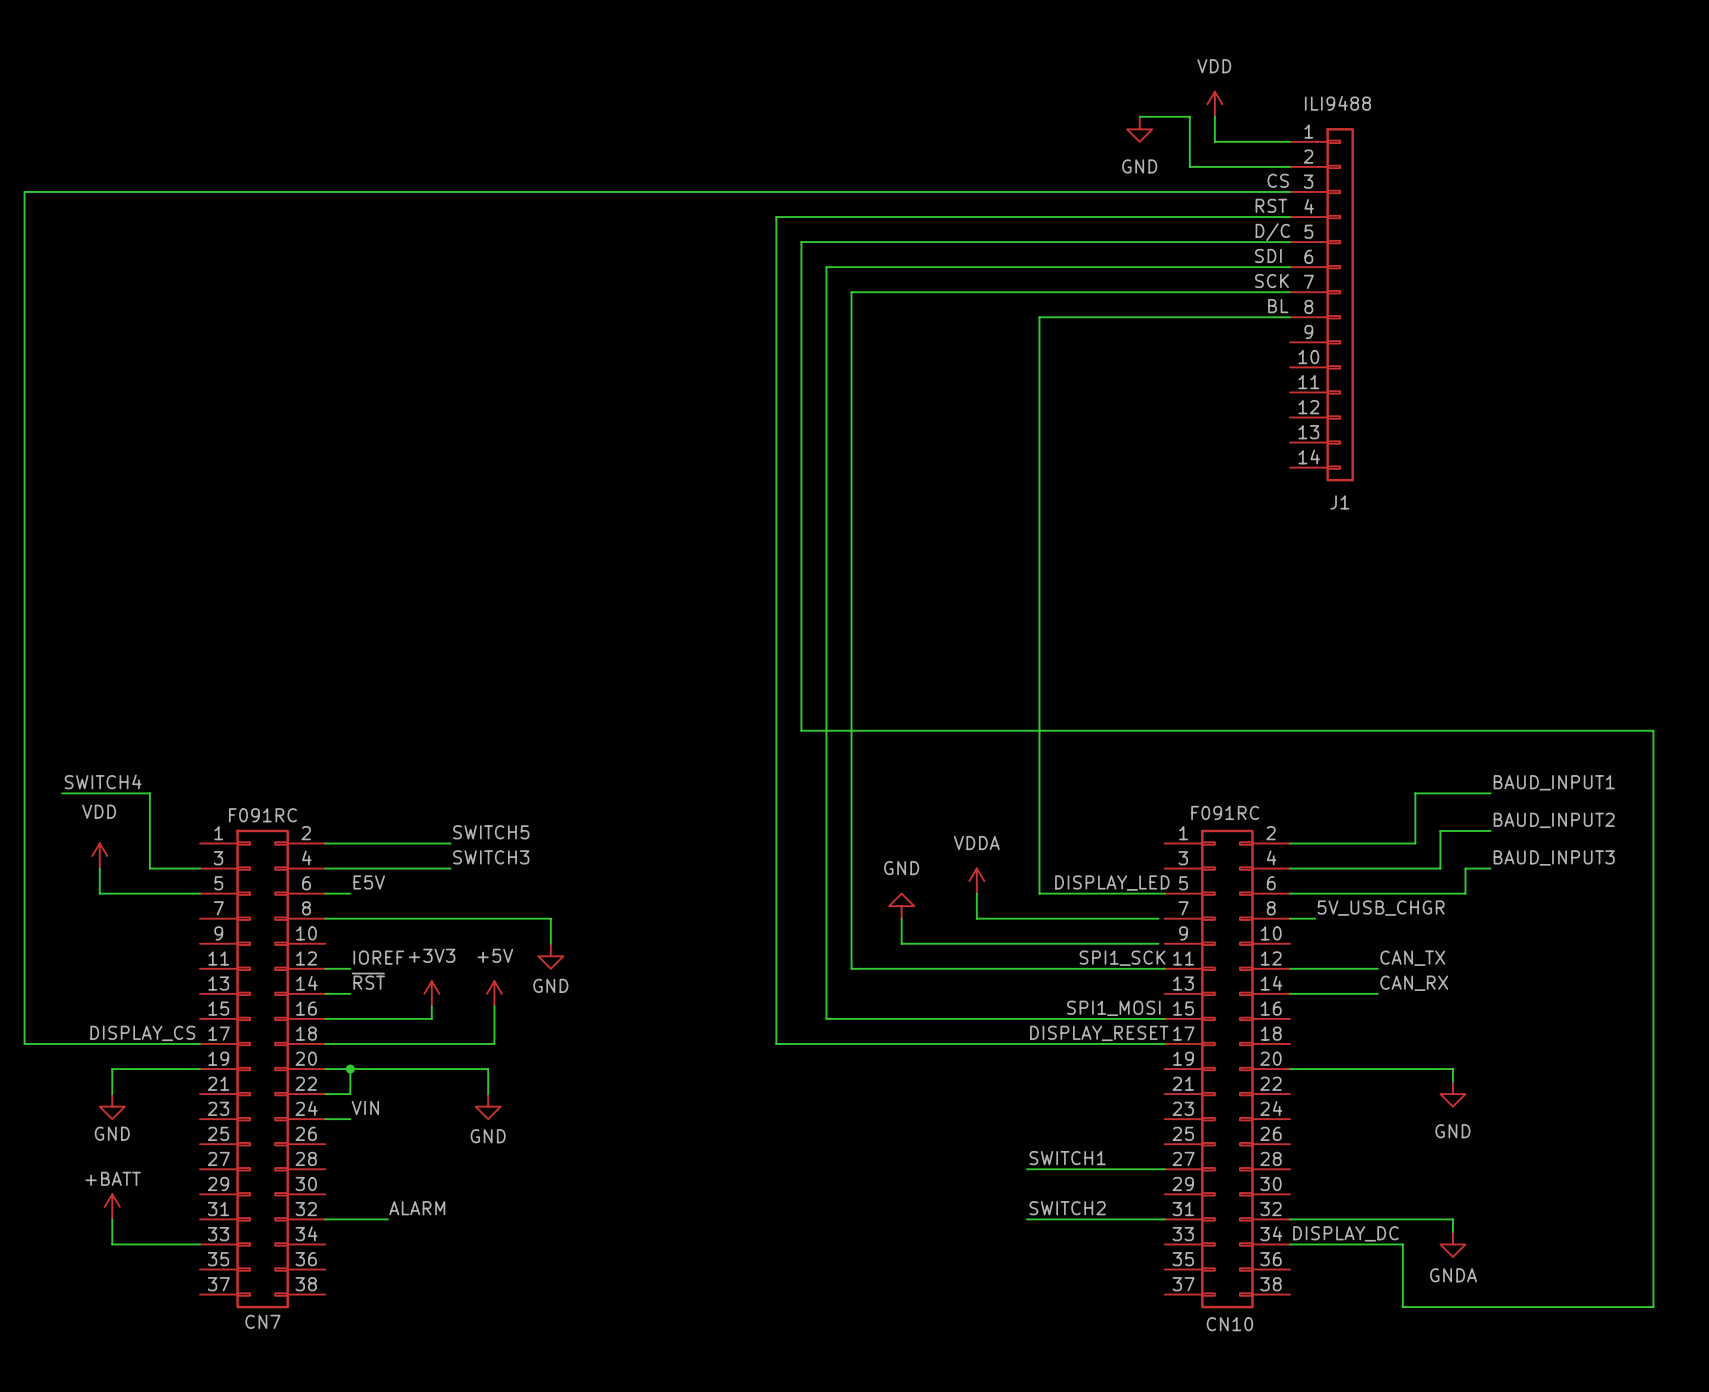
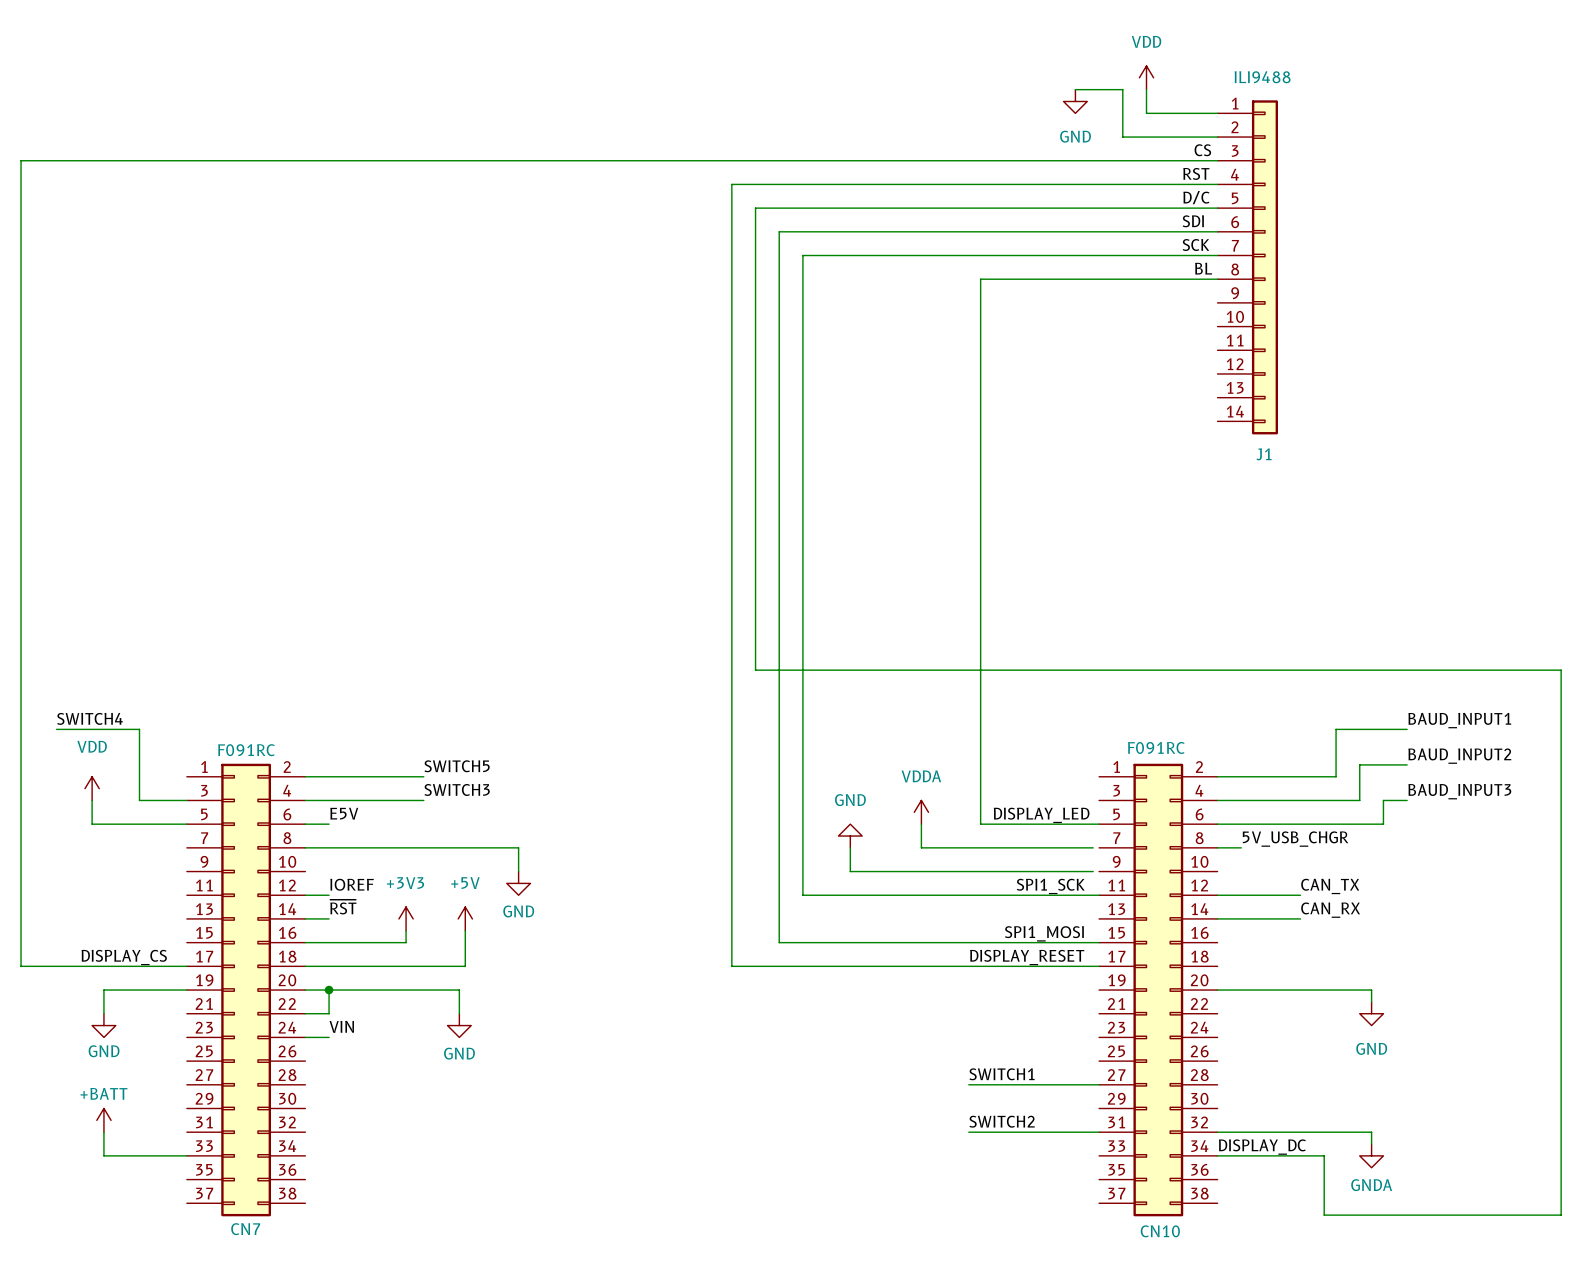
label: ALARM (417, 1208) -> none
wire: (325, 1219) (387, 1219) -> none

